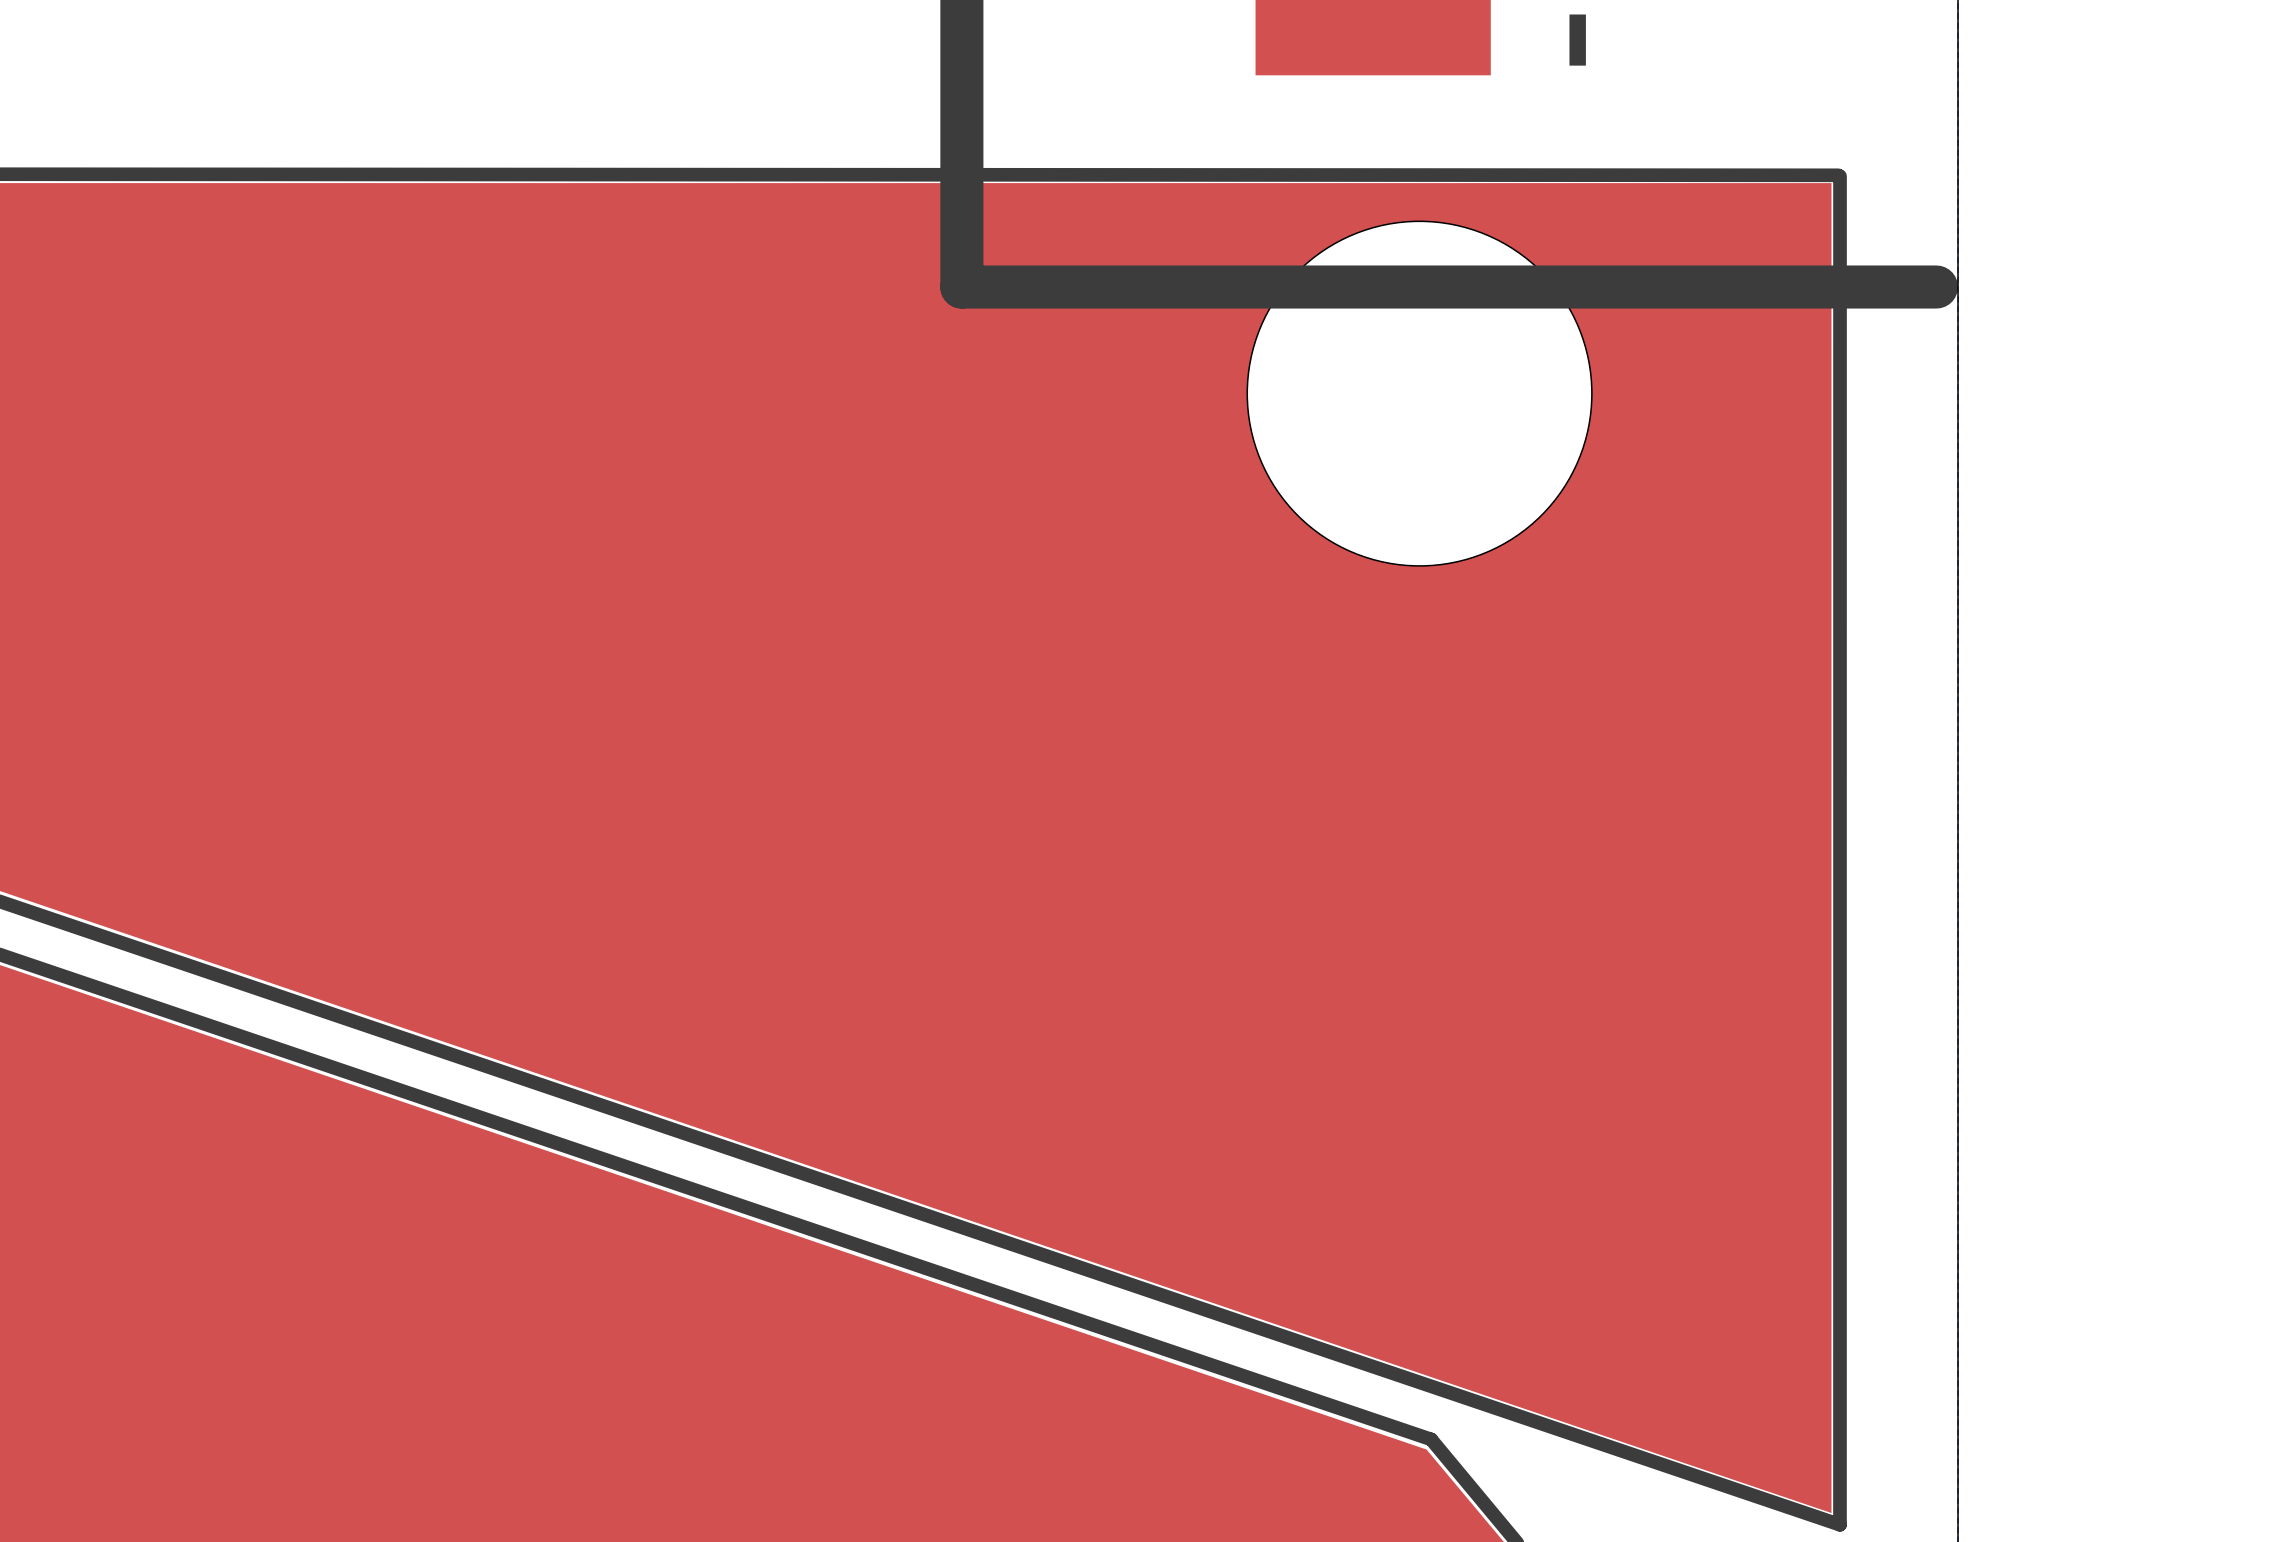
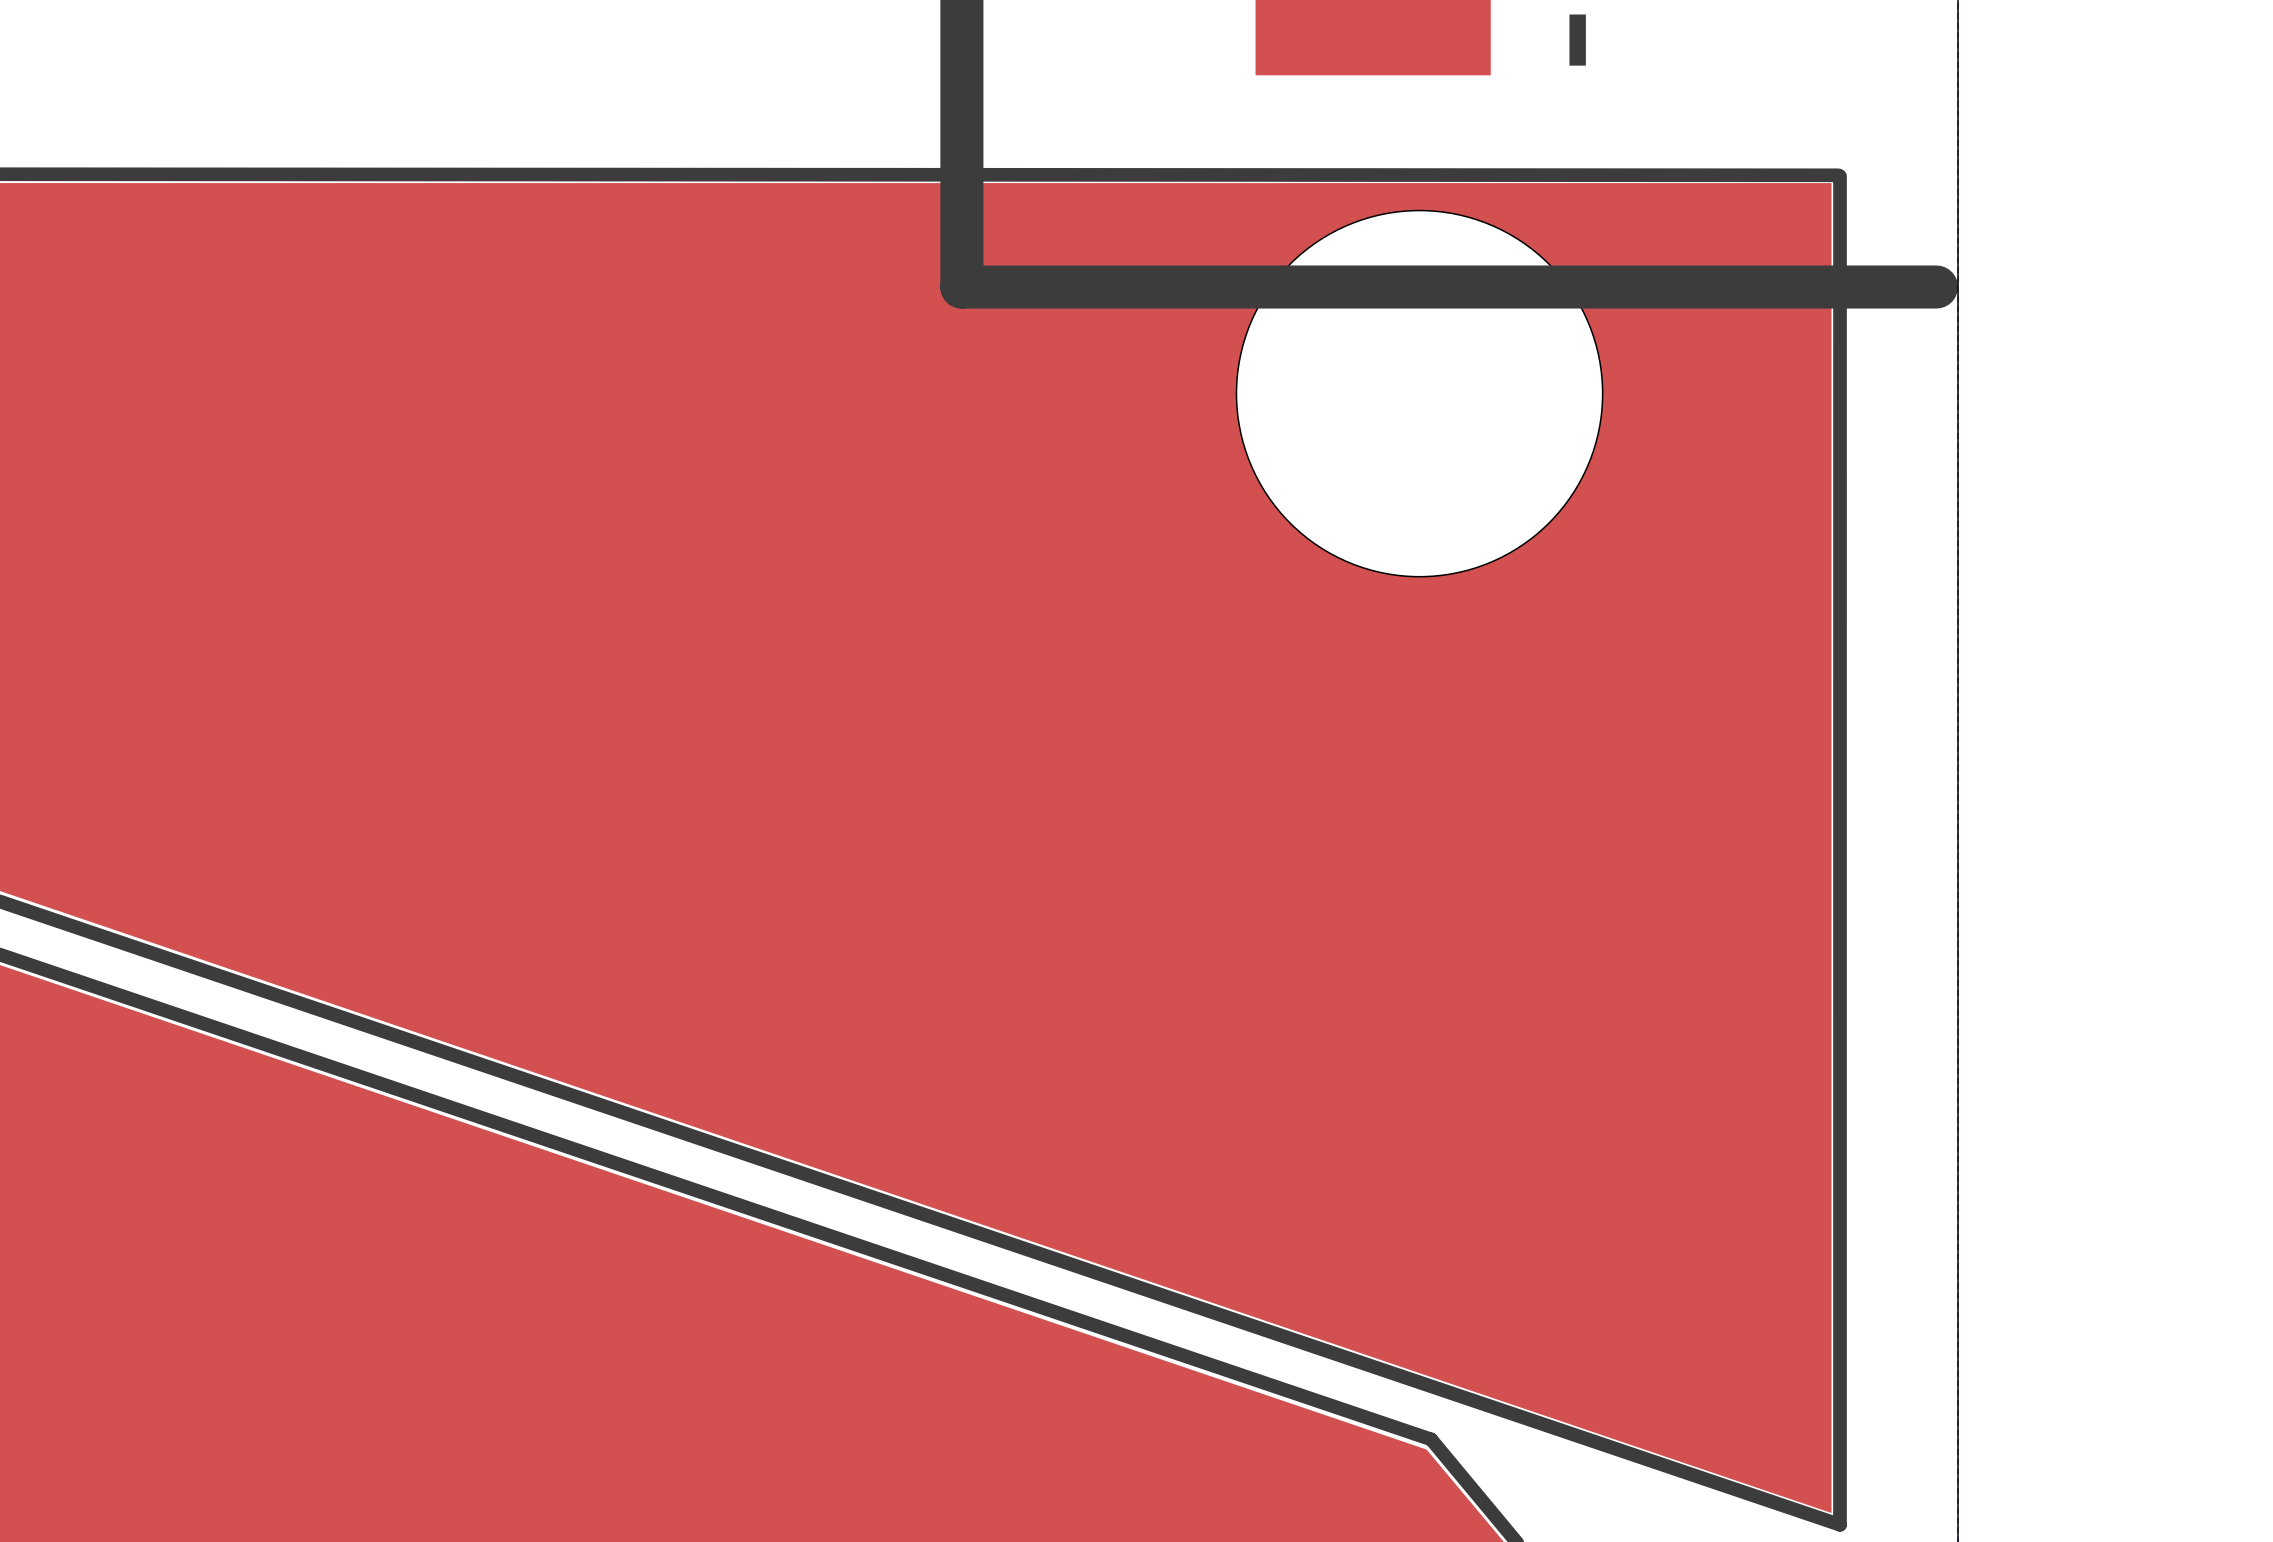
hole size: [1247, 221, 1592, 566] -> [1236, 210, 1603, 577]

